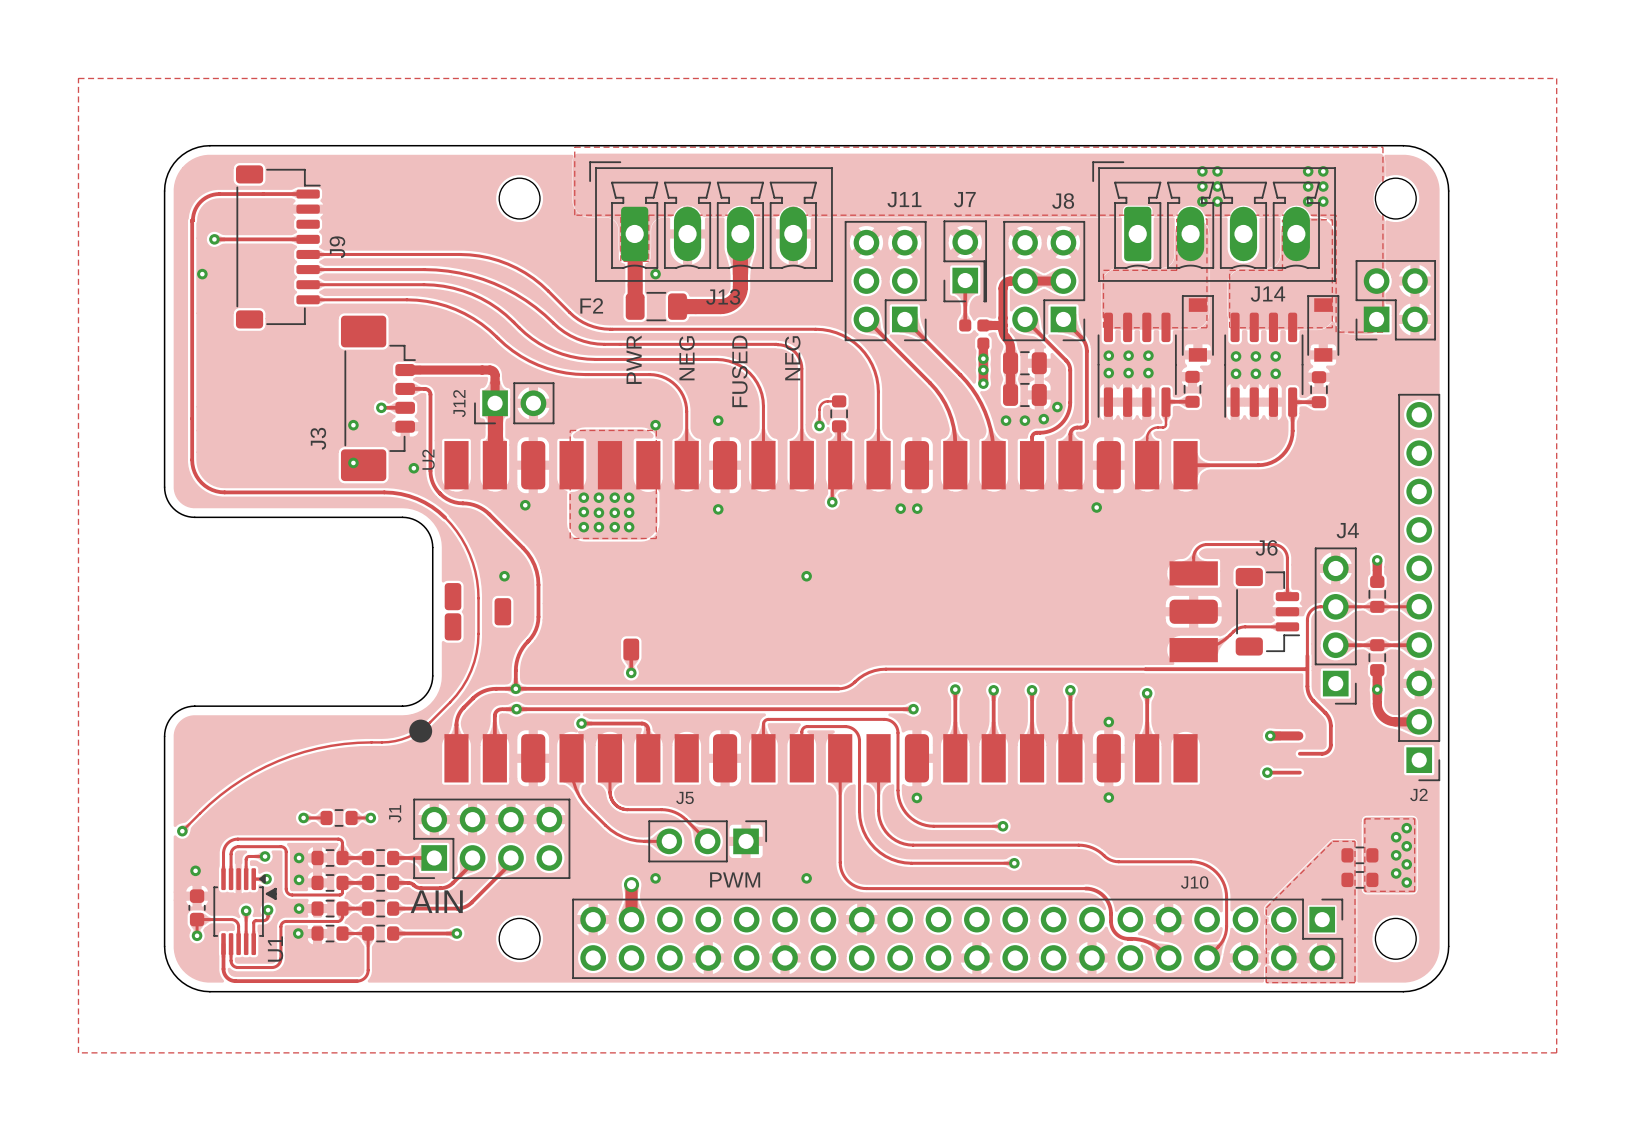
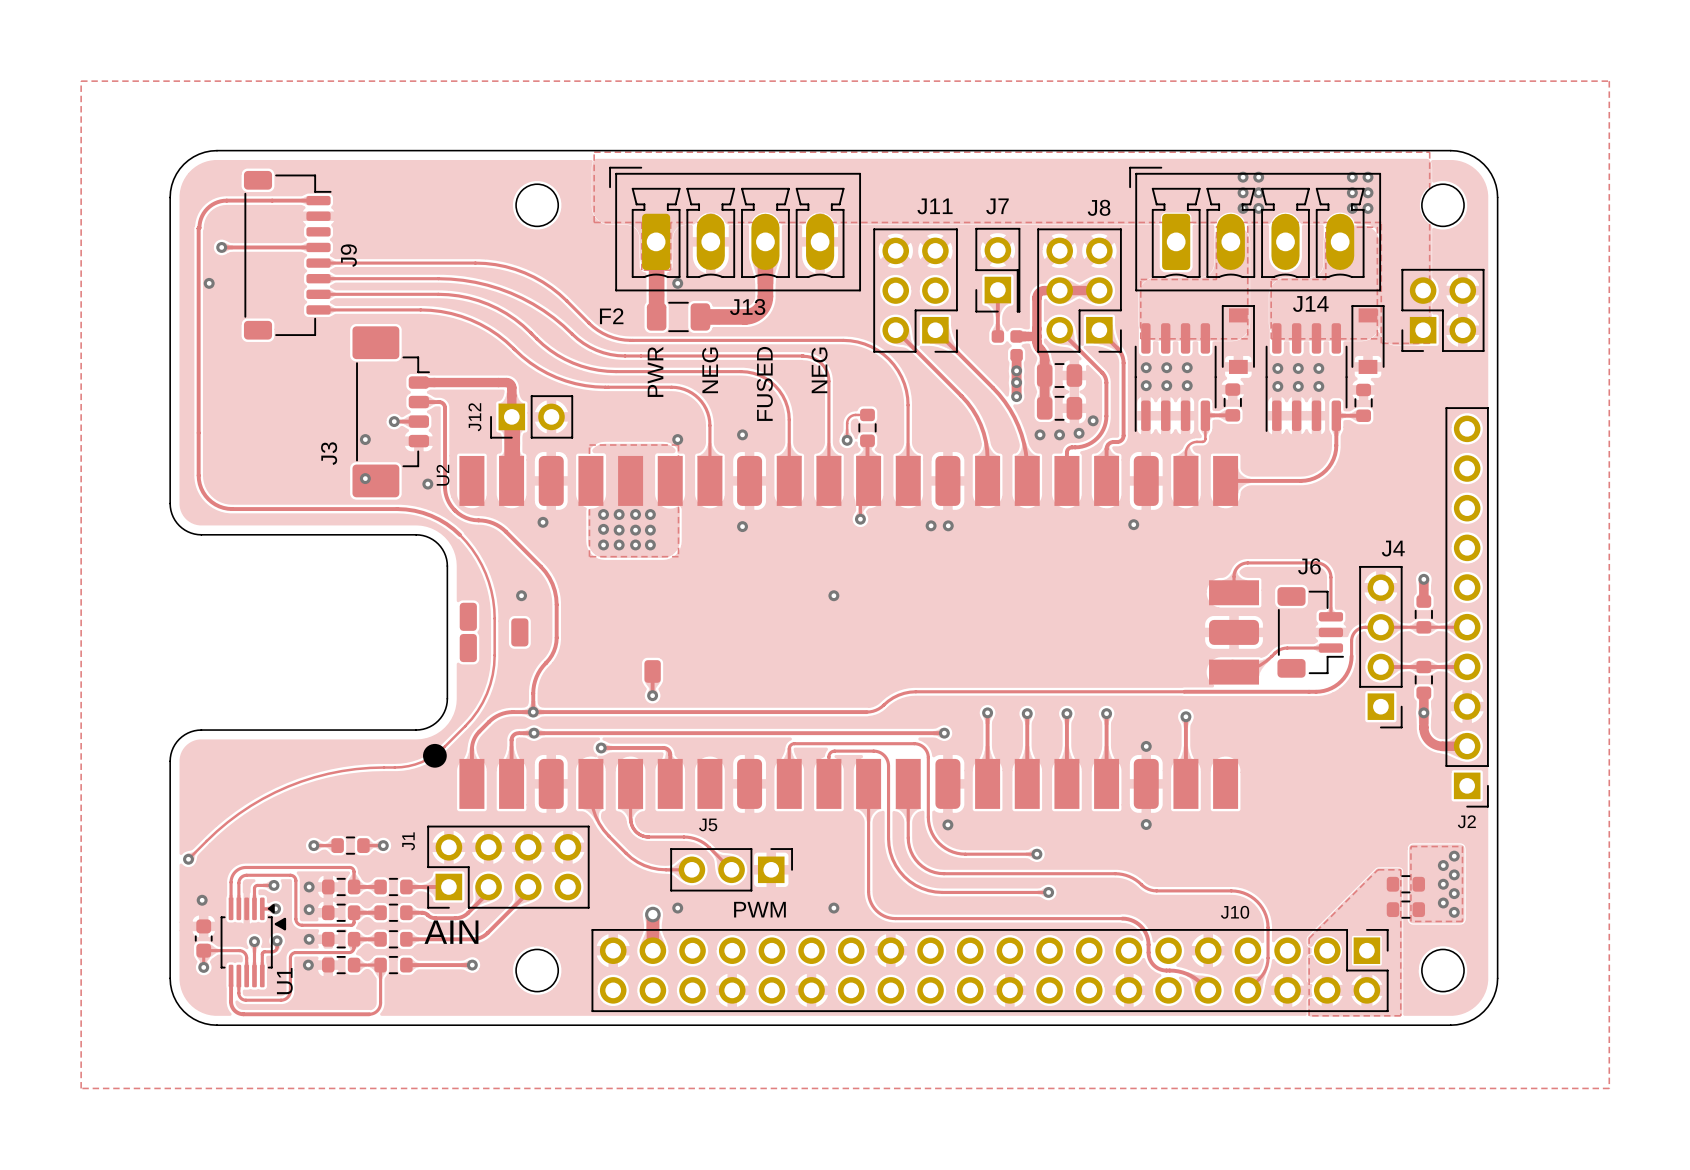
track: (1307, 634) (1308, 691) (1311, 699) (1329, 718) (1330, 745) (1329, 750) (1324, 753) (1299, 753) -> none
track: (1273, 669) (1306, 669) -> (1316, 691) (1331, 688) (1341, 681) (1348, 671) (1351, 656)
track: (1270, 735) (1298, 735) -> none
via: (1270, 735) -> none
track: (1267, 772) (1299, 772) -> none
via: (1267, 772) -> none

